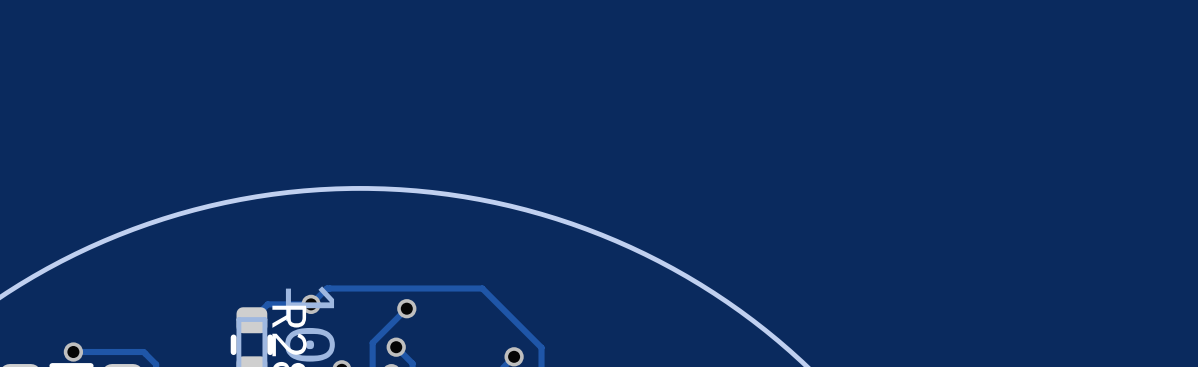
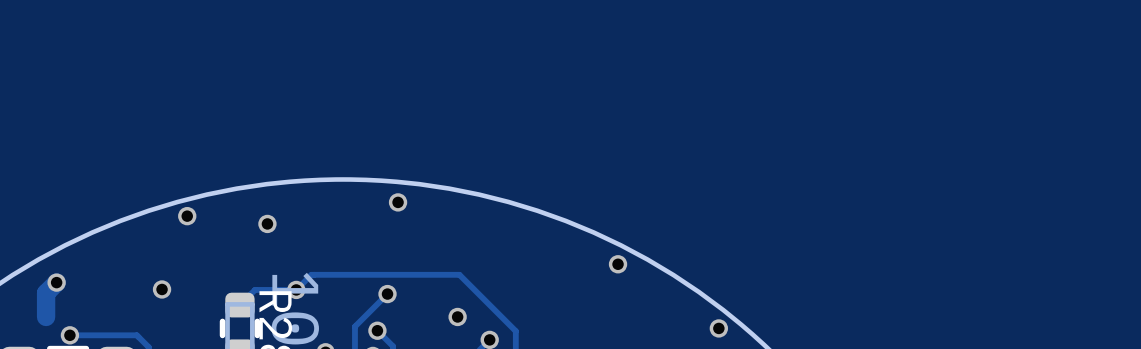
via: none -> (398, 202)
via: none -> (187, 216)
via: none -> (267, 223)
via: none -> (618, 264)
track: none -> (56, 282) (46, 293) (46, 316)
via: none -> (56, 282)
via: none -> (162, 289)
via: none -> (457, 316)
via: none -> (718, 328)

